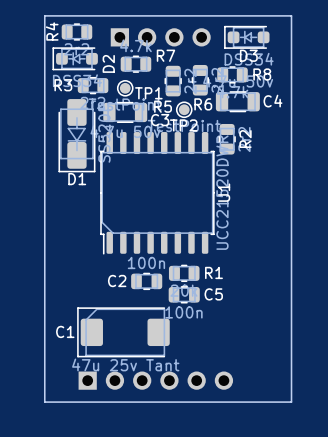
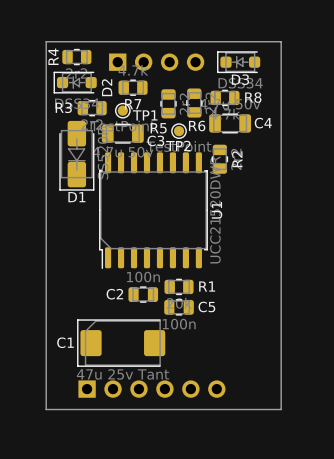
R7 name position: R7 (165, 55) -> R7 (133, 104)

